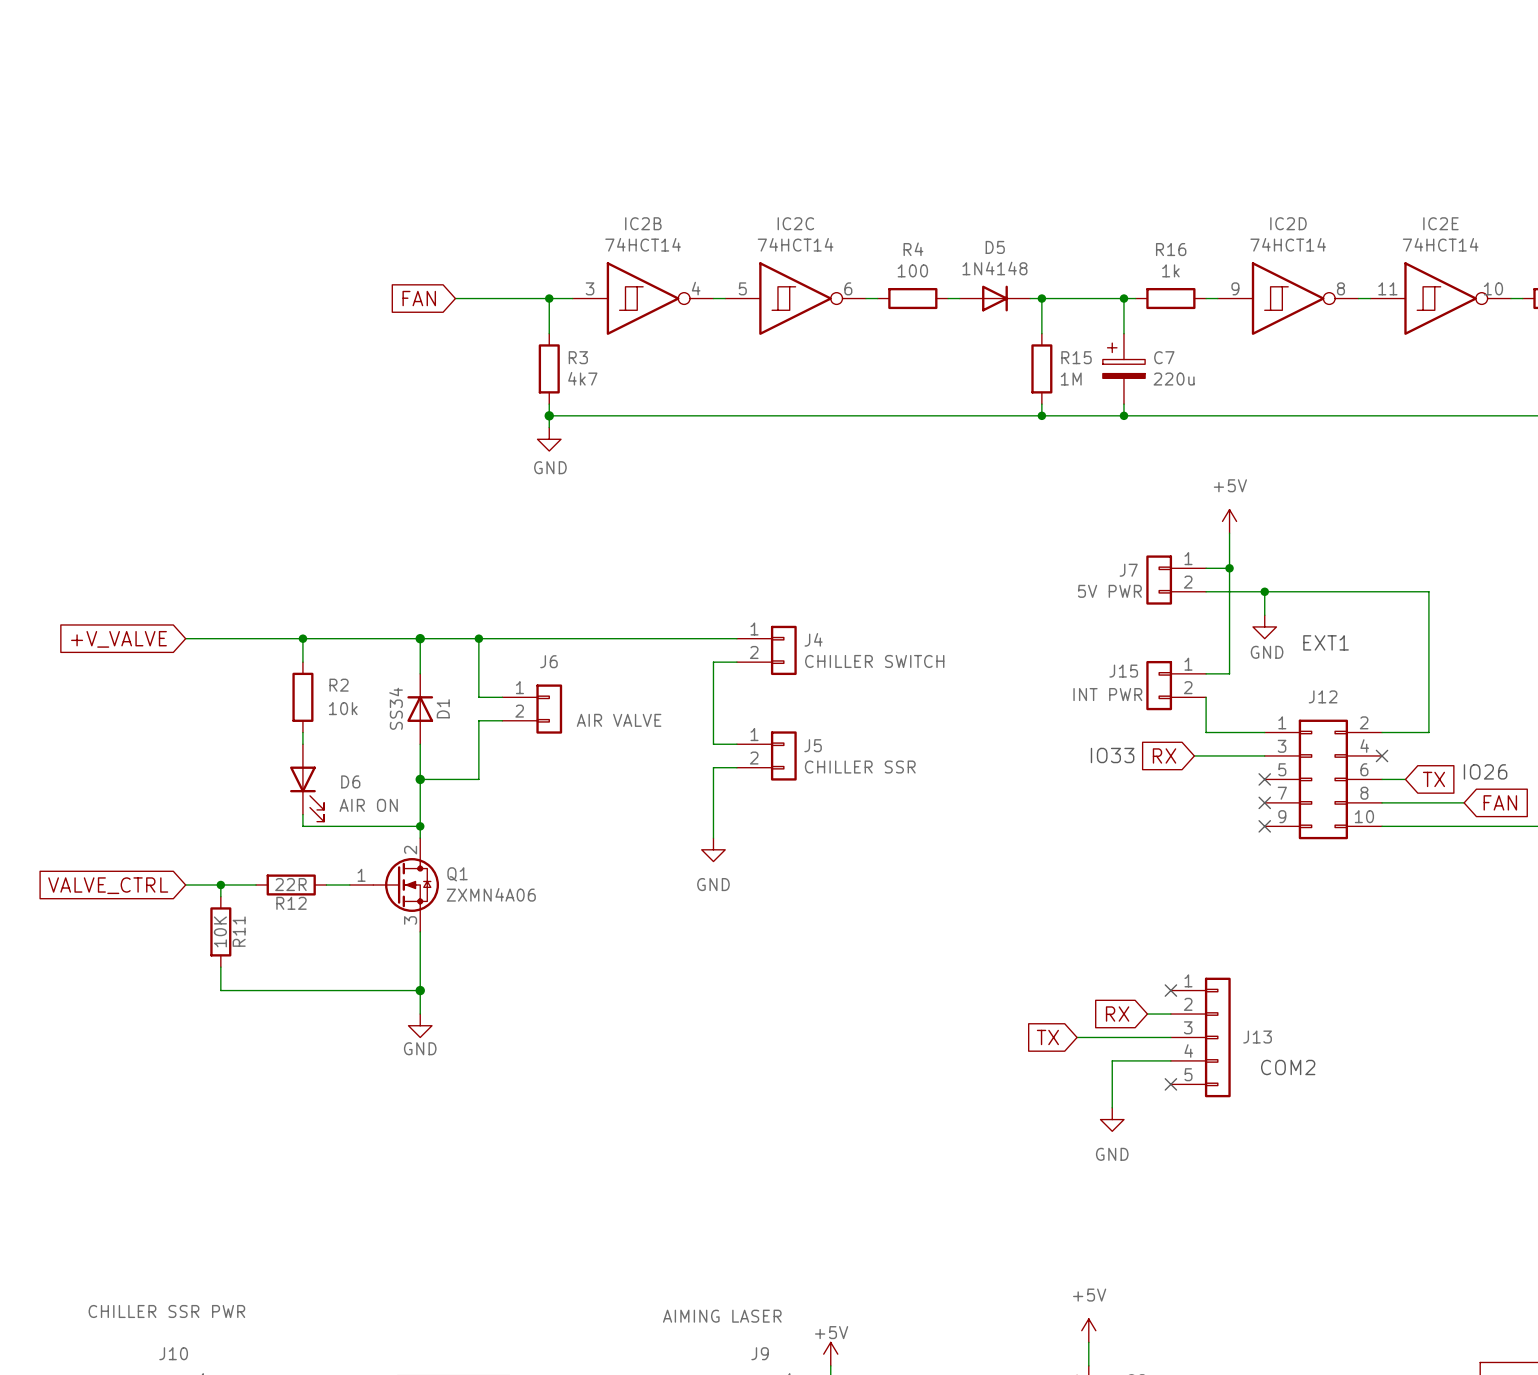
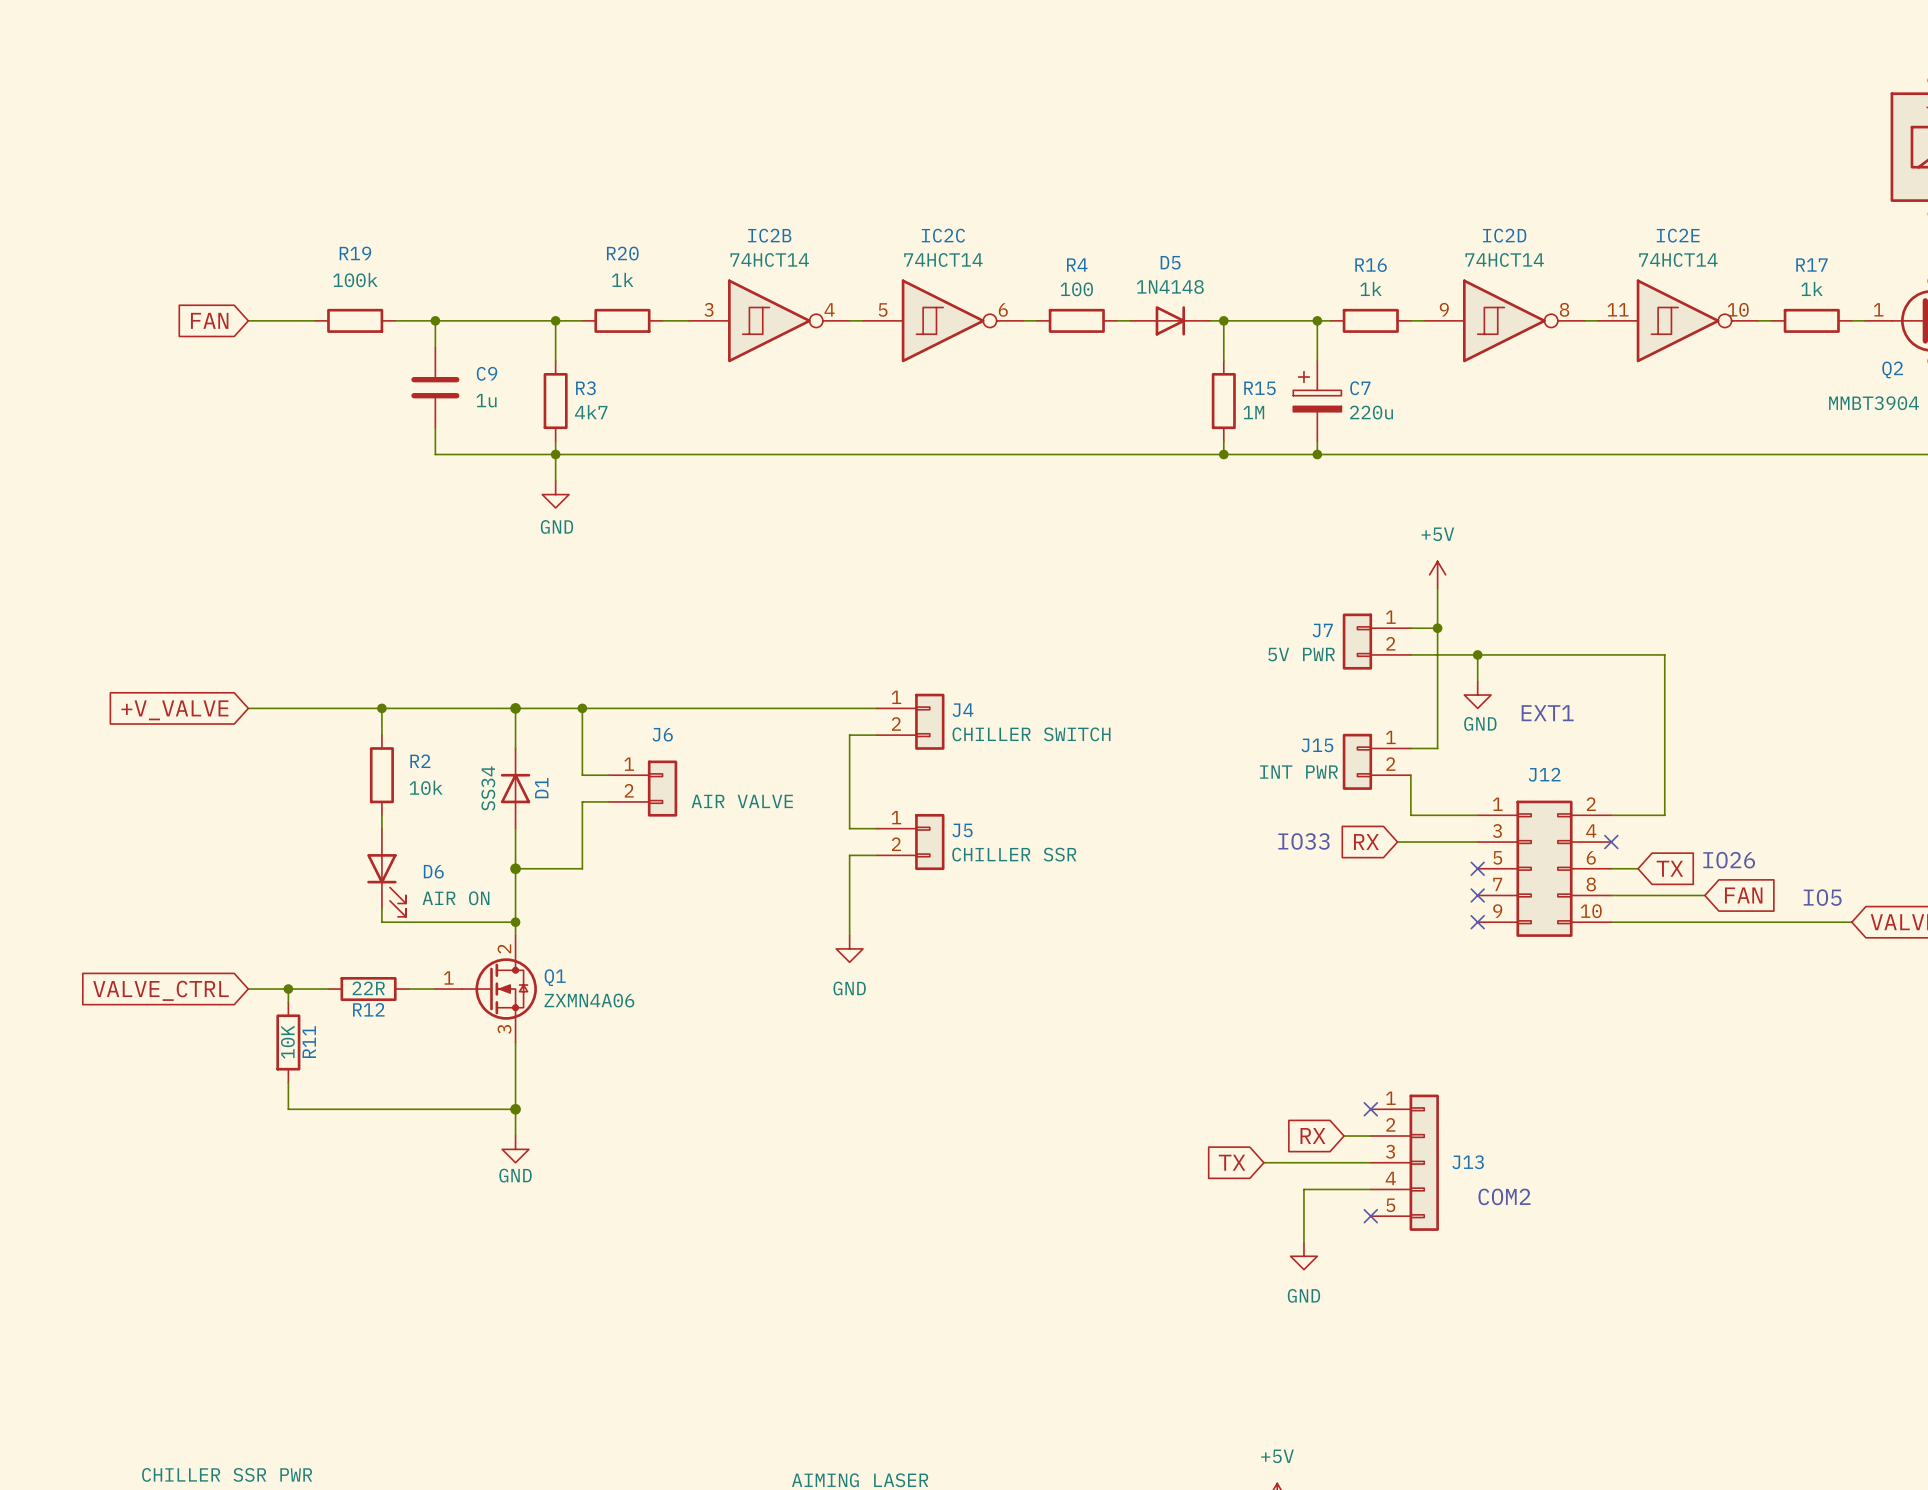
global label: none -> FAN (209, 320)
wire: none -> (248, 320) (315, 320)
R19: none -> 100k (355, 320)
wire: none -> (395, 320) (555, 320) (555, 360)
junction: none -> (435, 320)
global label: FAN (419, 298) -> none
junction: none -> (555, 320)
wire: (478, 298) (549, 298) (549, 333) -> none
R20: none -> 1k (622, 320)
junction: (549, 298) -> none
C9: none -> 1u (435, 387)
R3 position: (549, 368) -> (555, 401)
wire: none -> (435, 427) (435, 454) (662, 454)
wire: none -> (555, 441) (555, 481)
wire: (549, 404) (549, 427) -> (435, 320) (435, 347)
junction: none -> (555, 454)
junction: (549, 415) -> none
power symbol position: GND (549, 439) -> GND (555, 494)

